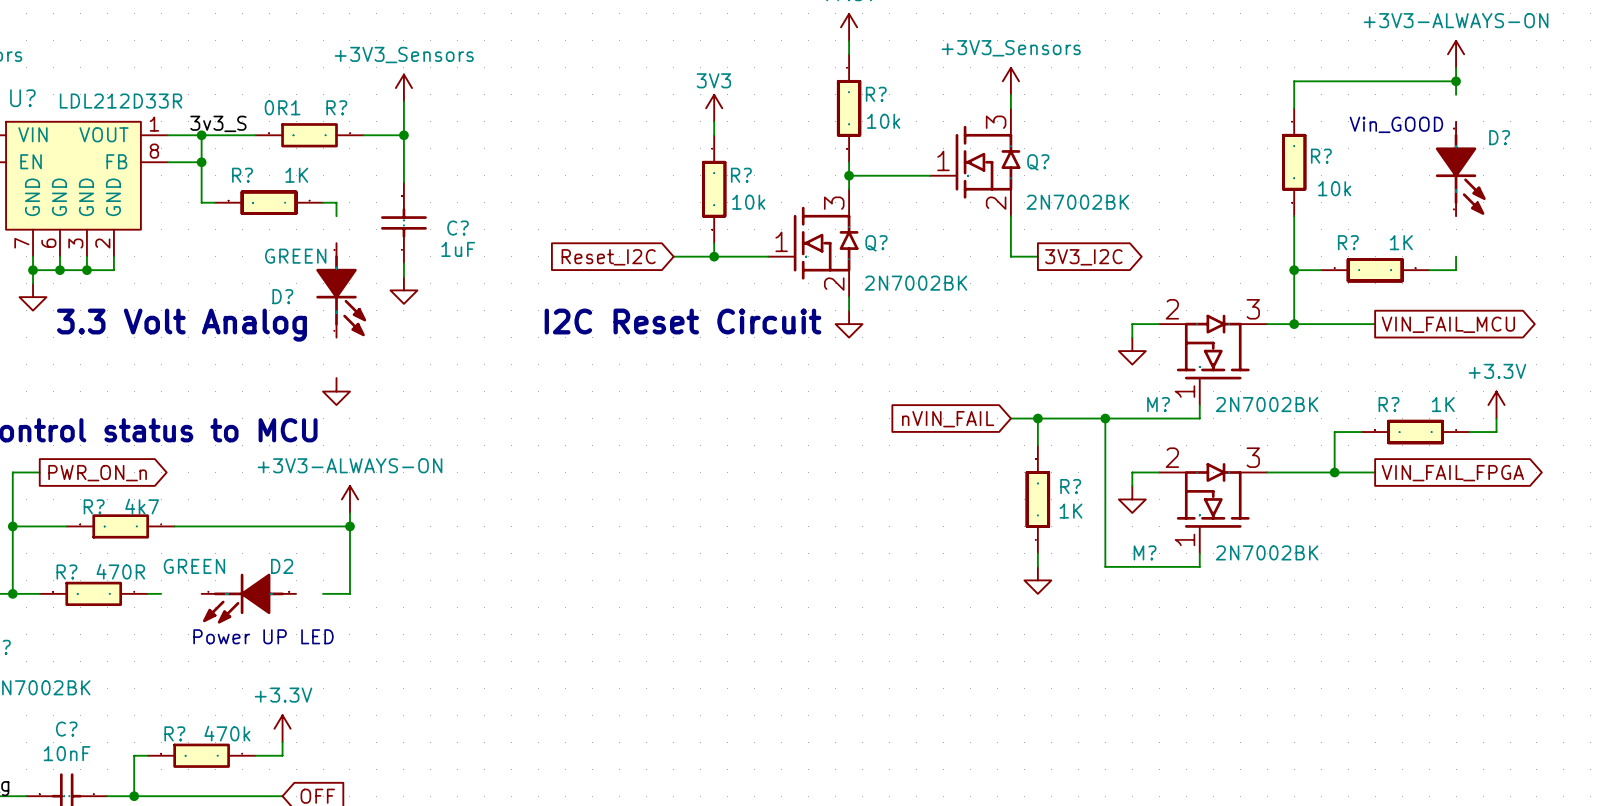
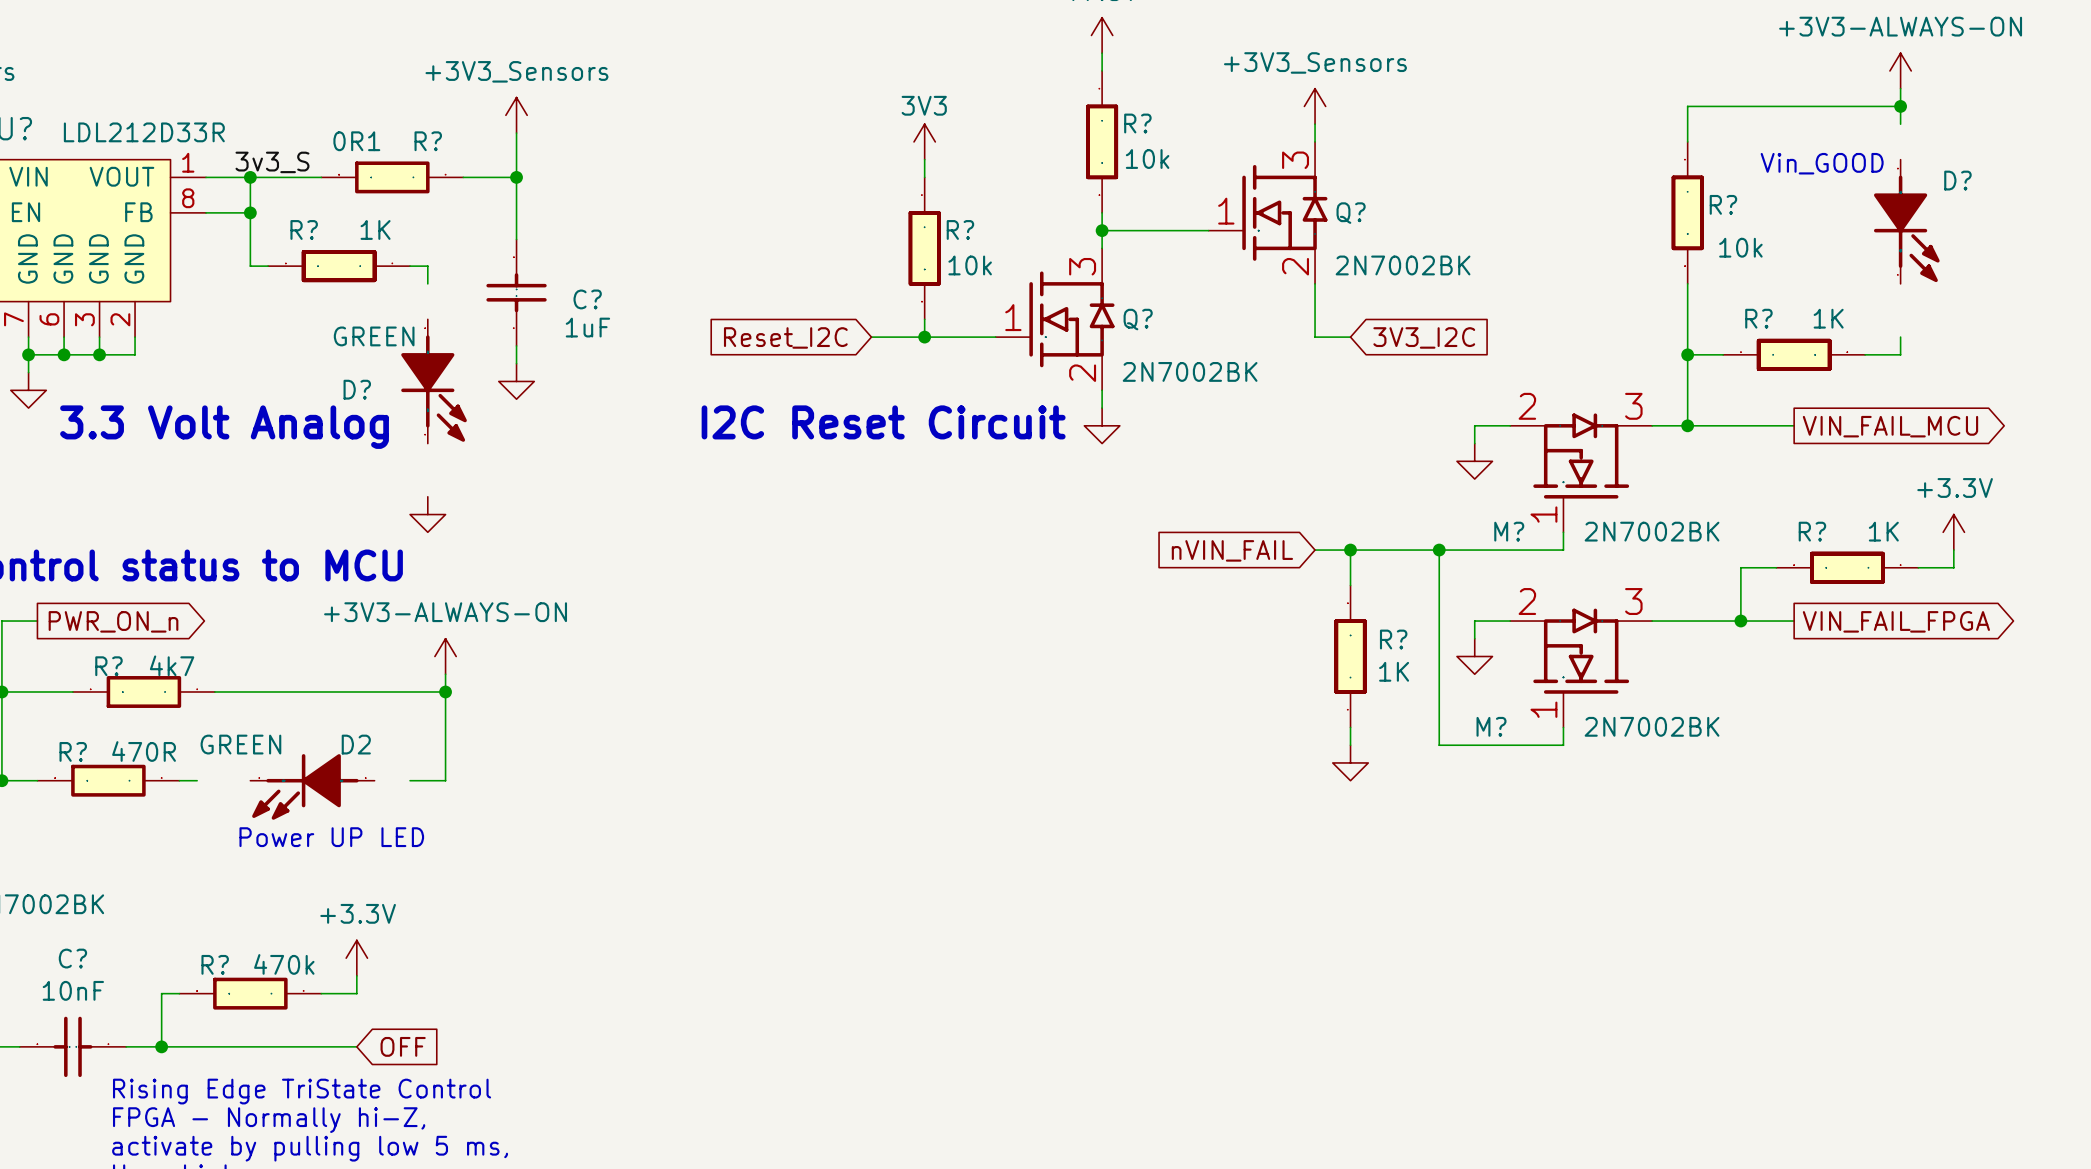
global label shape: output (1083, 257) -> input (1424, 337)

